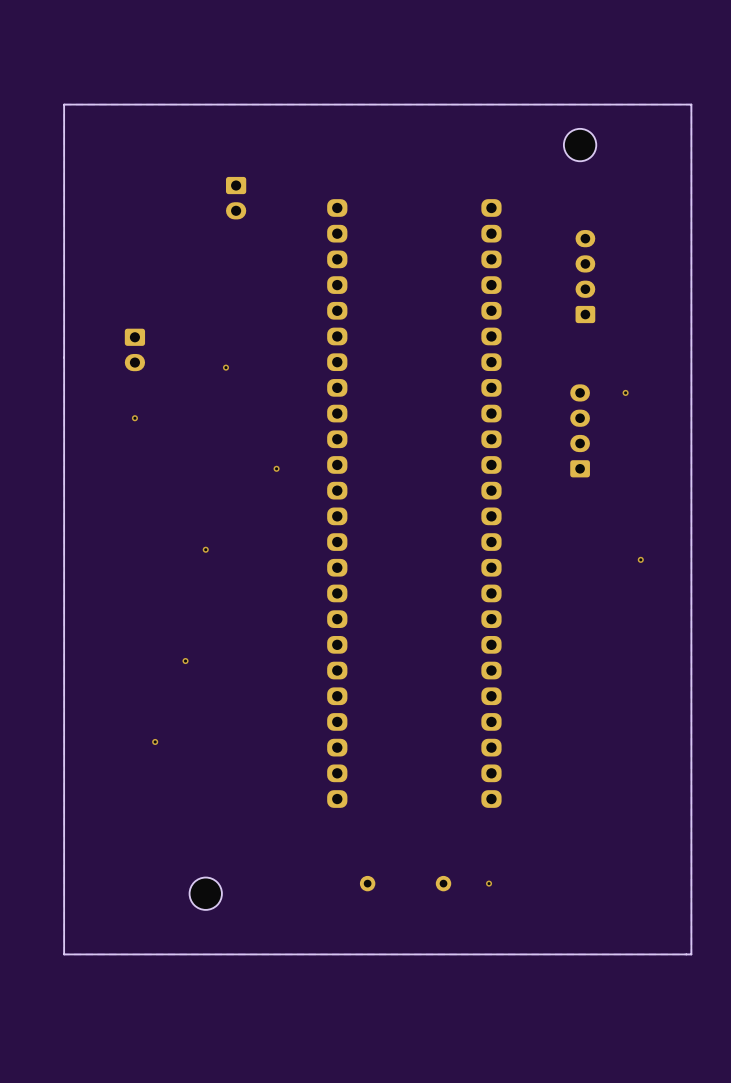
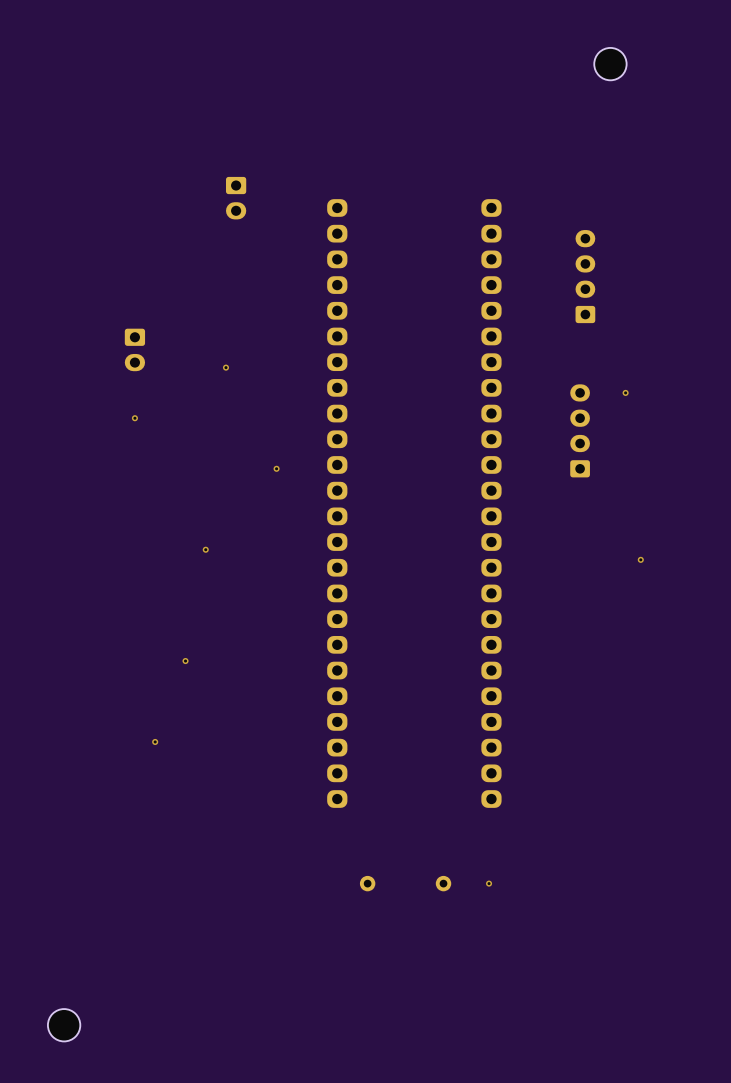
board edge: (691, 104) (691, 954) (64, 954) (64, 104) (691, 104) -> none
part position: (580, 145) -> (610, 64)
part position: (205, 893) -> (64, 1025)

